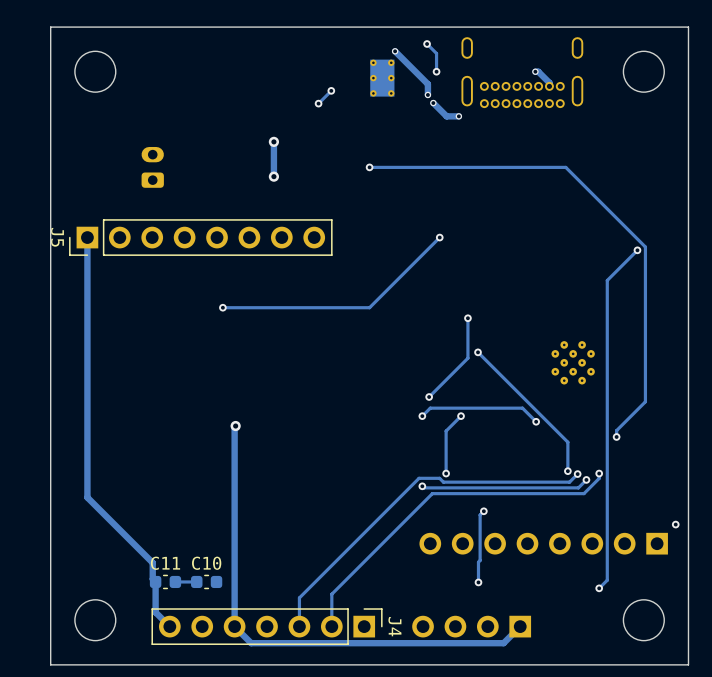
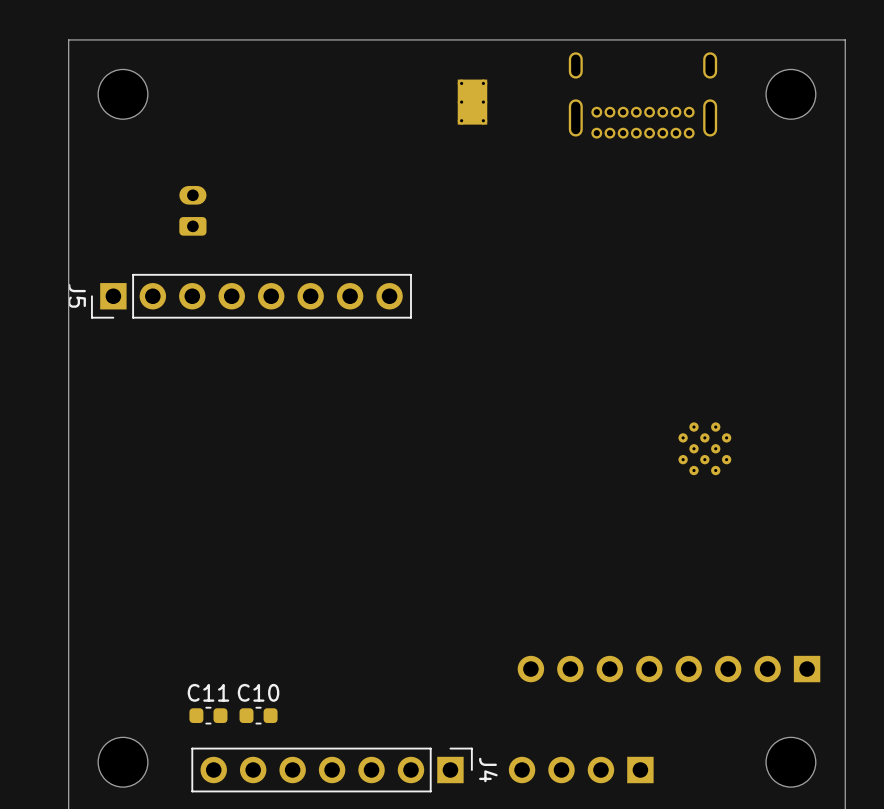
track: (427, 43) (436, 53) (436, 71) -> none
via: (427, 43) -> none
track: (395, 51) (427, 84) (427, 94) -> none
via: (395, 51) -> none
via: (436, 71) -> none
track: (535, 71) (538, 71) (549, 82) (549, 86) -> none
via: (535, 71) -> none
track: (331, 90) (318, 103) -> none
via: (331, 90) -> none
via: (427, 94) -> none
via: (318, 103) -> none
track: (433, 103) (446, 116) (458, 116) -> none
via: (433, 103) -> none
via: (458, 116) -> none
track: (273, 141) (273, 176) -> none
via: (273, 141) -> none
track: (369, 167) (565, 167) (645, 247) (645, 401) (616, 430) (616, 436) -> none
via: (369, 167) -> none
via: (273, 176) -> none
track: (87, 237) (87, 497) (152, 562) (152, 579) (155, 581) (155, 612) (169, 626) -> none
track: (439, 237) (369, 307) (222, 307) -> none
via: (439, 237) -> none
track: (637, 250) (607, 280) (607, 580) (599, 588) -> none
via: (637, 250) -> none
via: (222, 307) -> none
track: (467, 318) (467, 358) (429, 397) -> none
via: (467, 318) -> none
track: (478, 352) (567, 442) (567, 471) -> none
via: (478, 352) -> none
via: (429, 397) -> none
track: (422, 416) (430, 408) (522, 408) (536, 421) -> none
via: (422, 416) -> none
track: (461, 416) (446, 431) (446, 473) -> none
via: (461, 416) -> none
via: (536, 421) -> none
track: (235, 426) (234, 626) (251, 643) (503, 643) (520, 626) -> none
via: (235, 426) -> none
via: (616, 436) -> none
via: (567, 471) -> none
via: (446, 473) -> none
track: (599, 473) (599, 478) (584, 493) (432, 493) (331, 594) (331, 626) -> none
via: (599, 473) -> none
track: (577, 474) (569, 482) (443, 482) (439, 478) (419, 478) (299, 597) (299, 626) -> none
via: (577, 474) -> none
track: (586, 479) (578, 487) (423, 487) (422, 486) -> none
via: (586, 479) -> none
via: (422, 486) -> none
track: (483, 511) (480, 515) (478, 582) -> none
via: (483, 511) -> none
via: (675, 524) -> none
track: (196, 581) (175, 581) -> none
via: (478, 582) -> none
via: (599, 588) -> none

